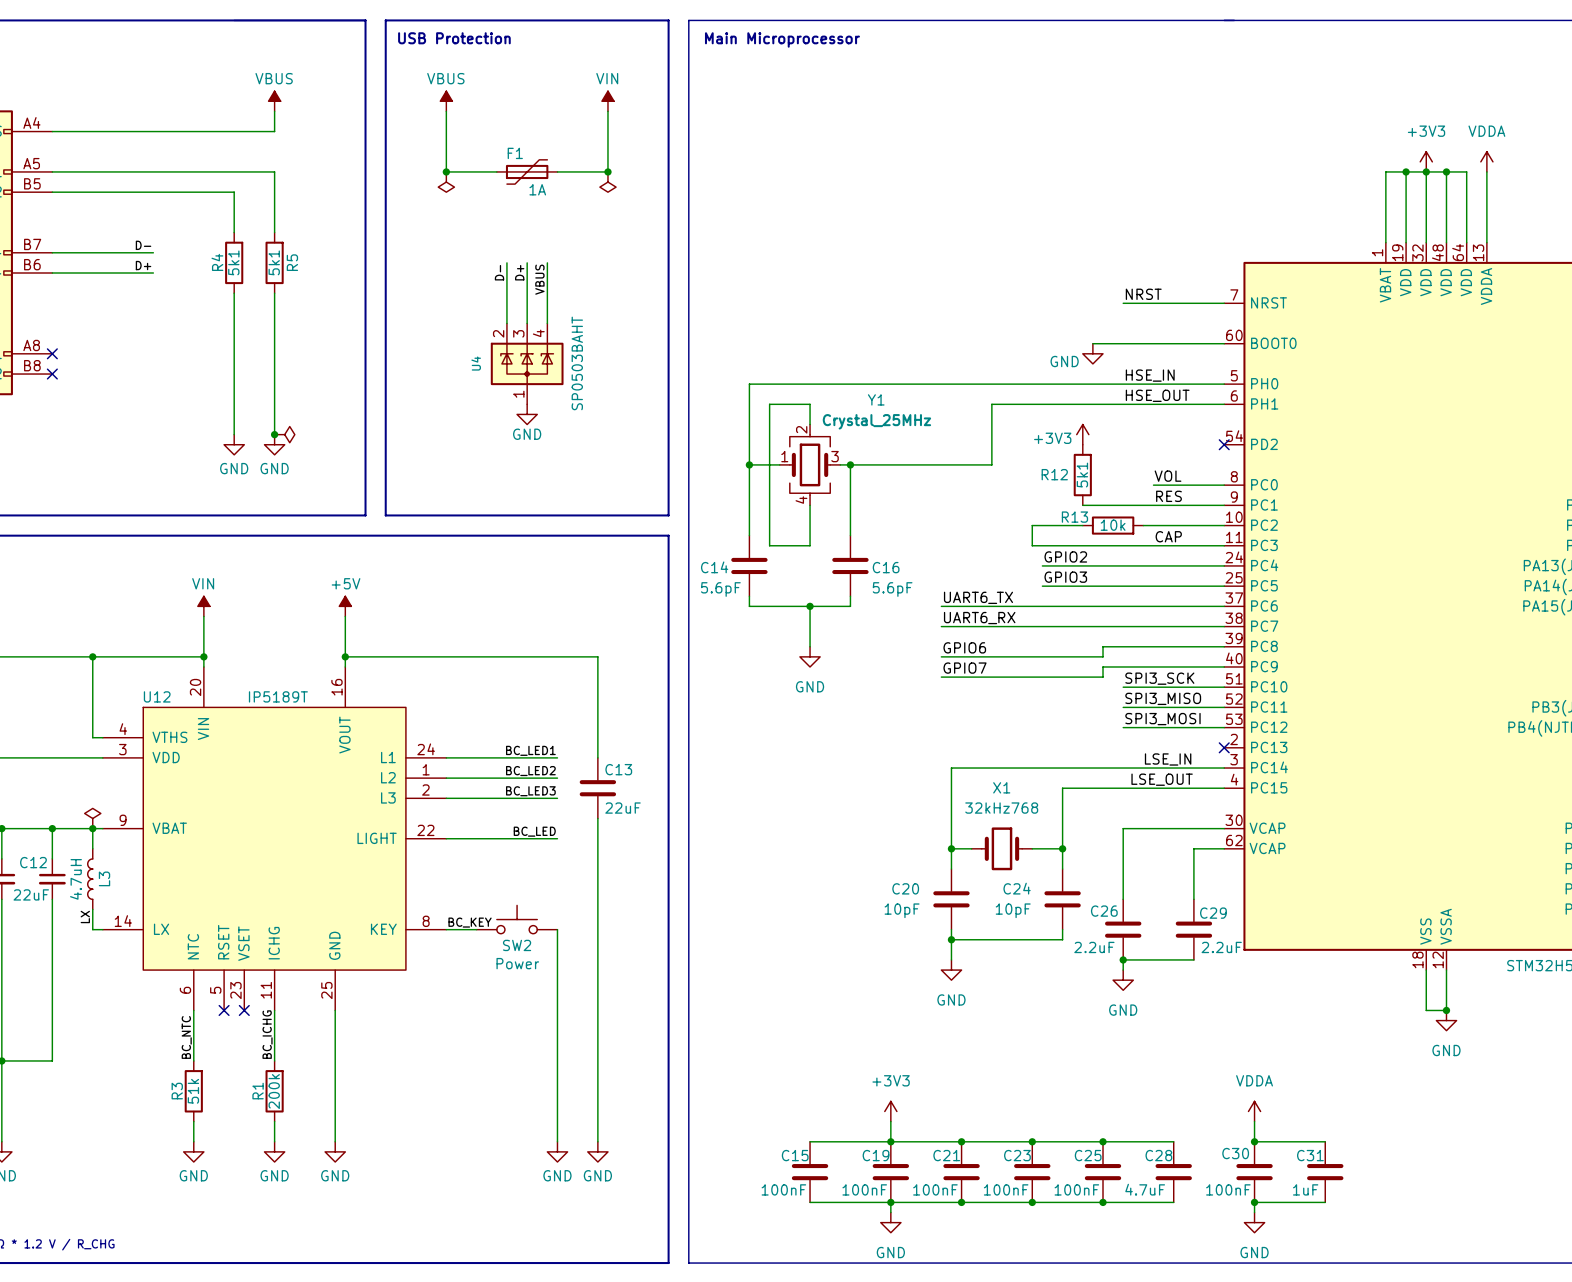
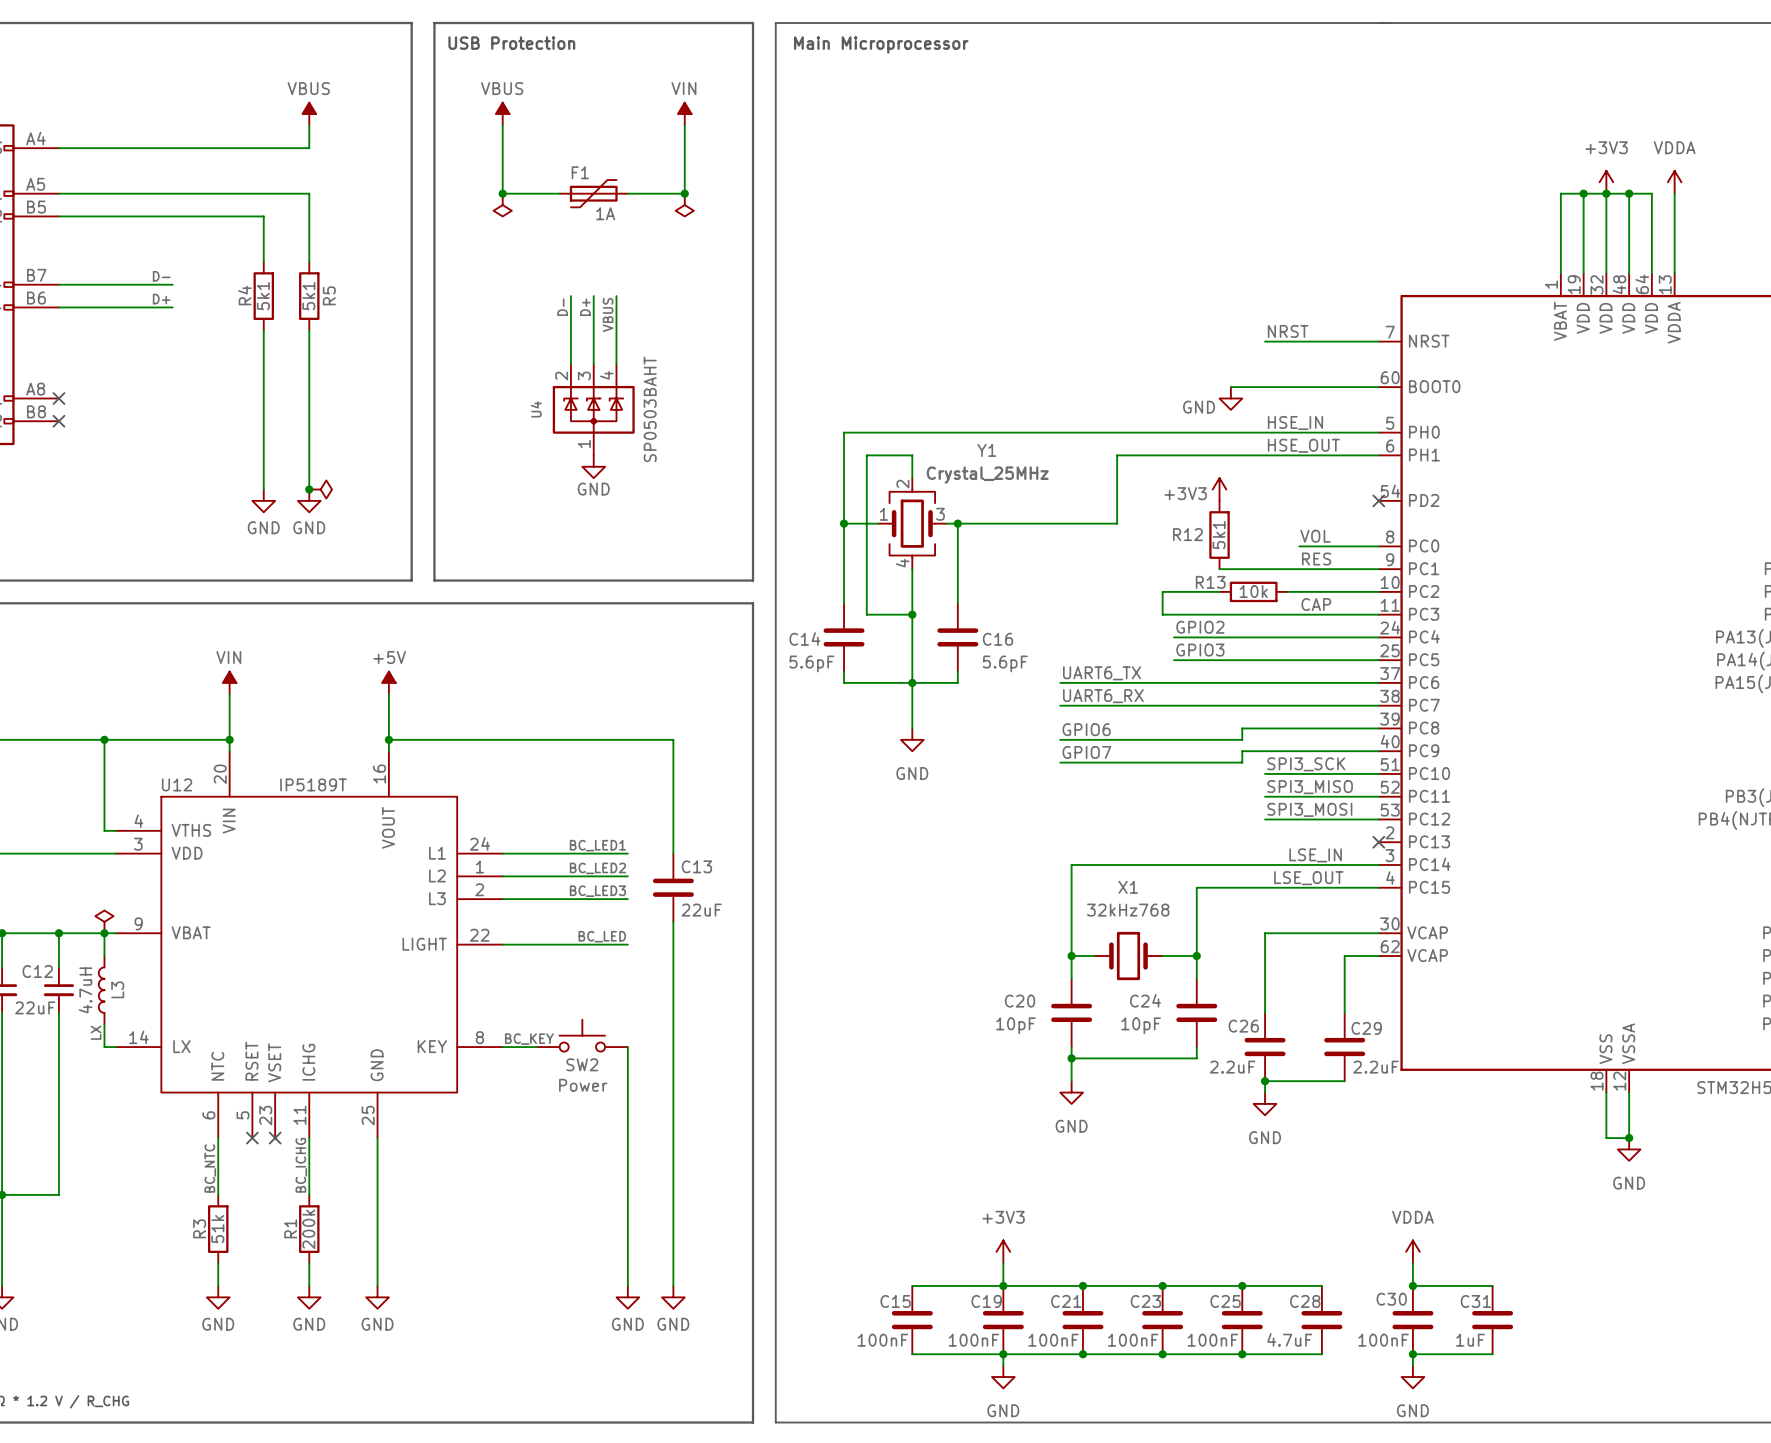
wire: none -> (912, 614) (912, 682)
junction: none -> (912, 614)

